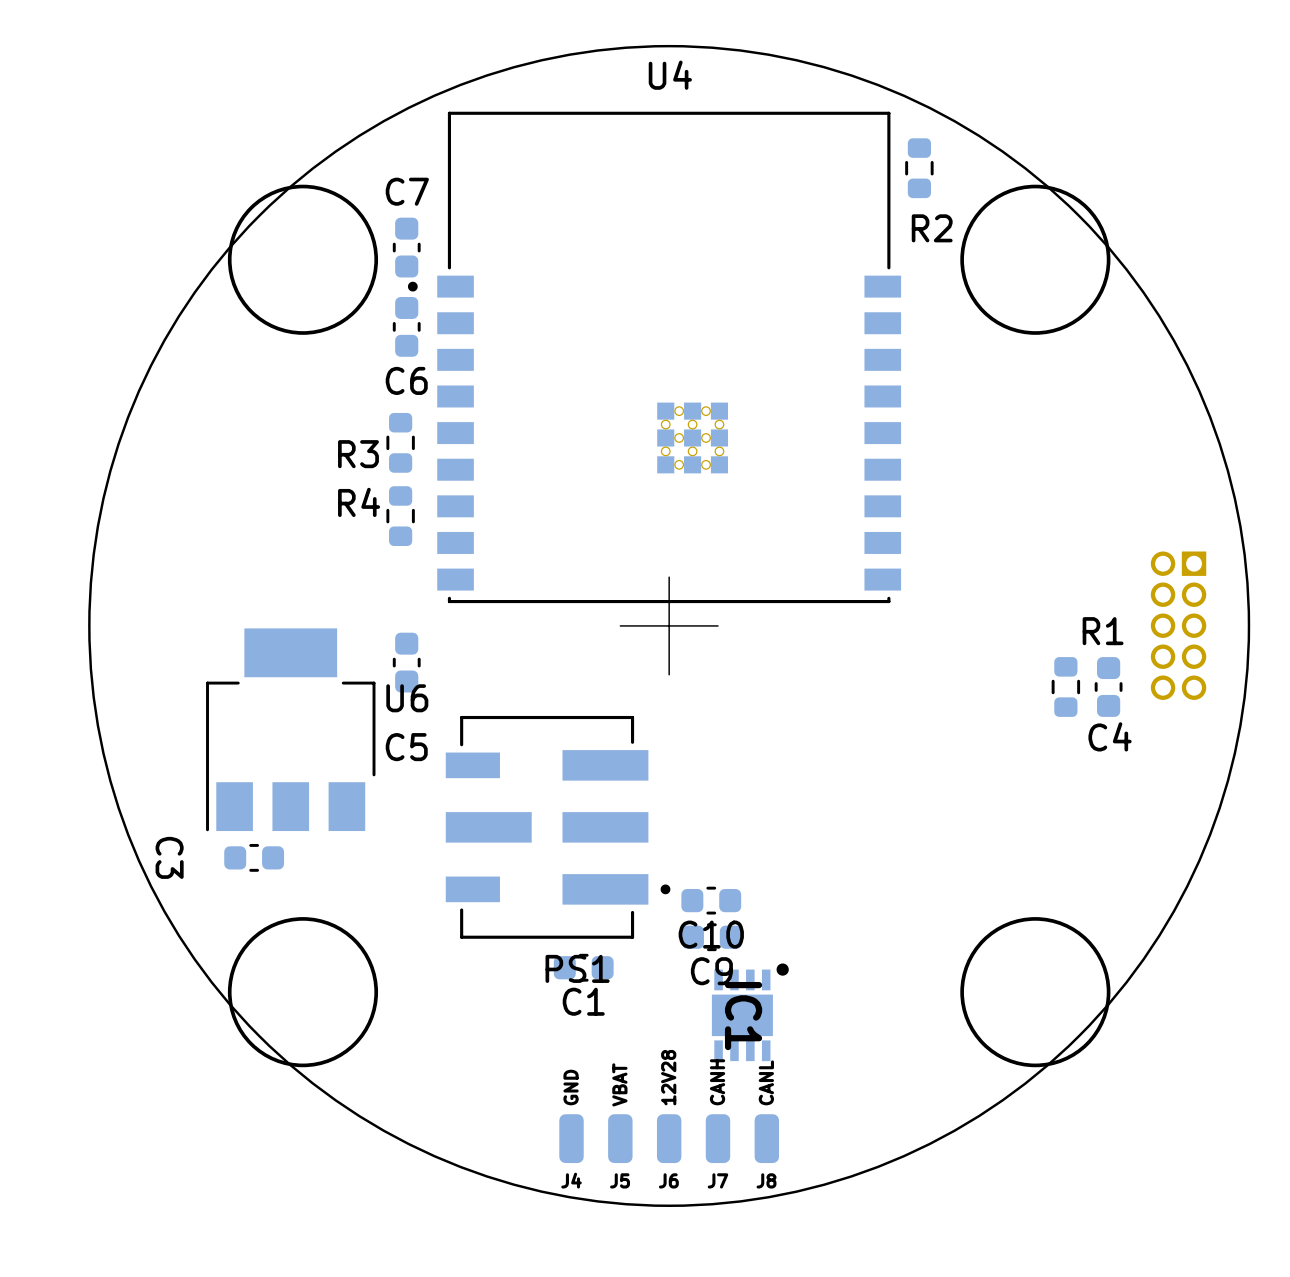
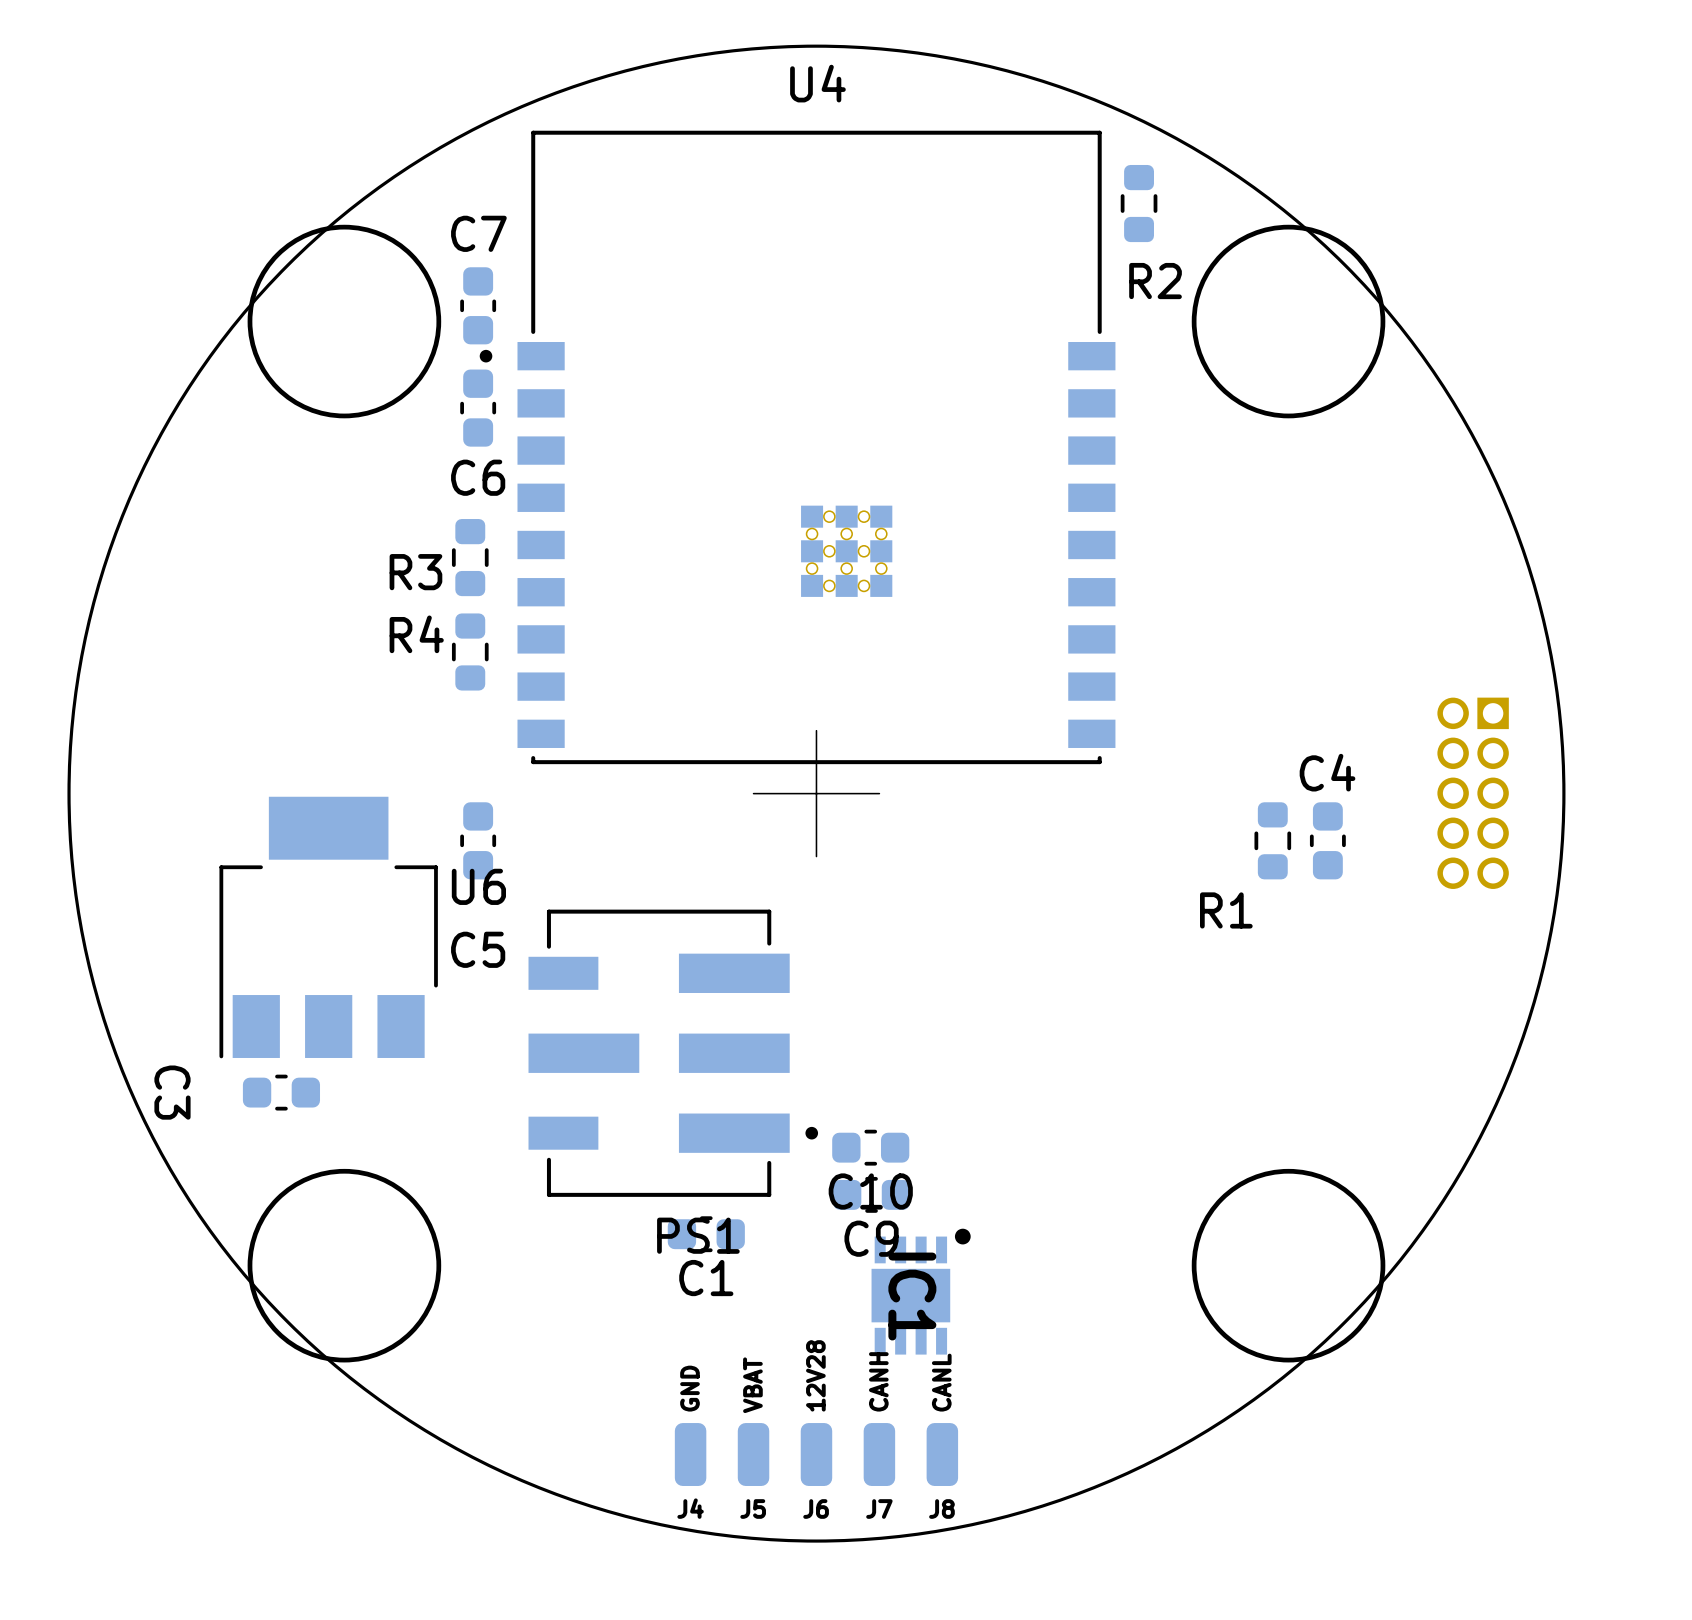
R1 name position: R1 (1103, 631) -> R1 (1226, 910)
R1 position: (1065, 686) -> (1272, 840)
C4 position: (1108, 686) -> (1327, 840)
C4 name position: C4 (1110, 736) -> C4 (1327, 772)

